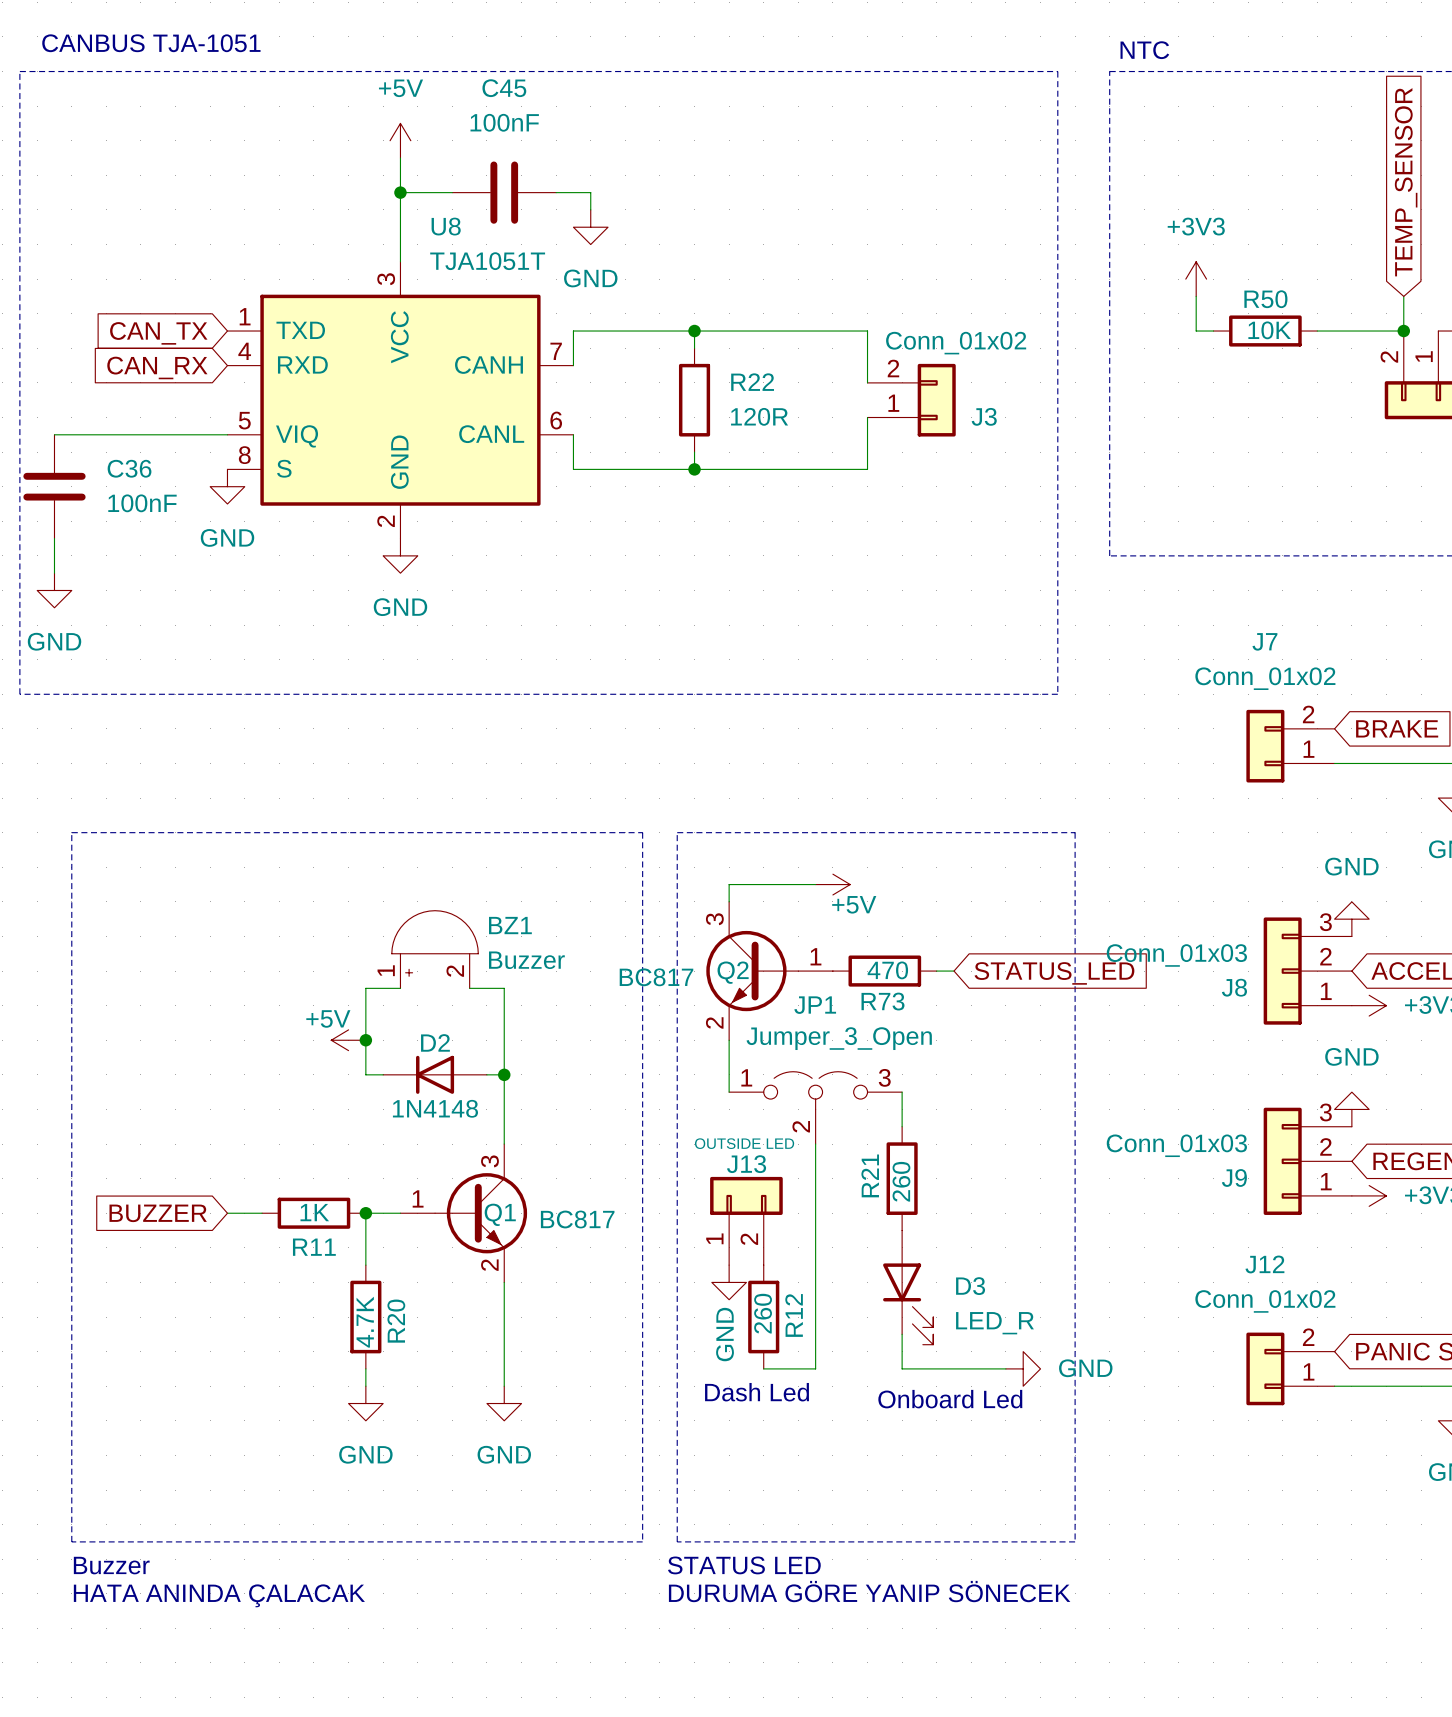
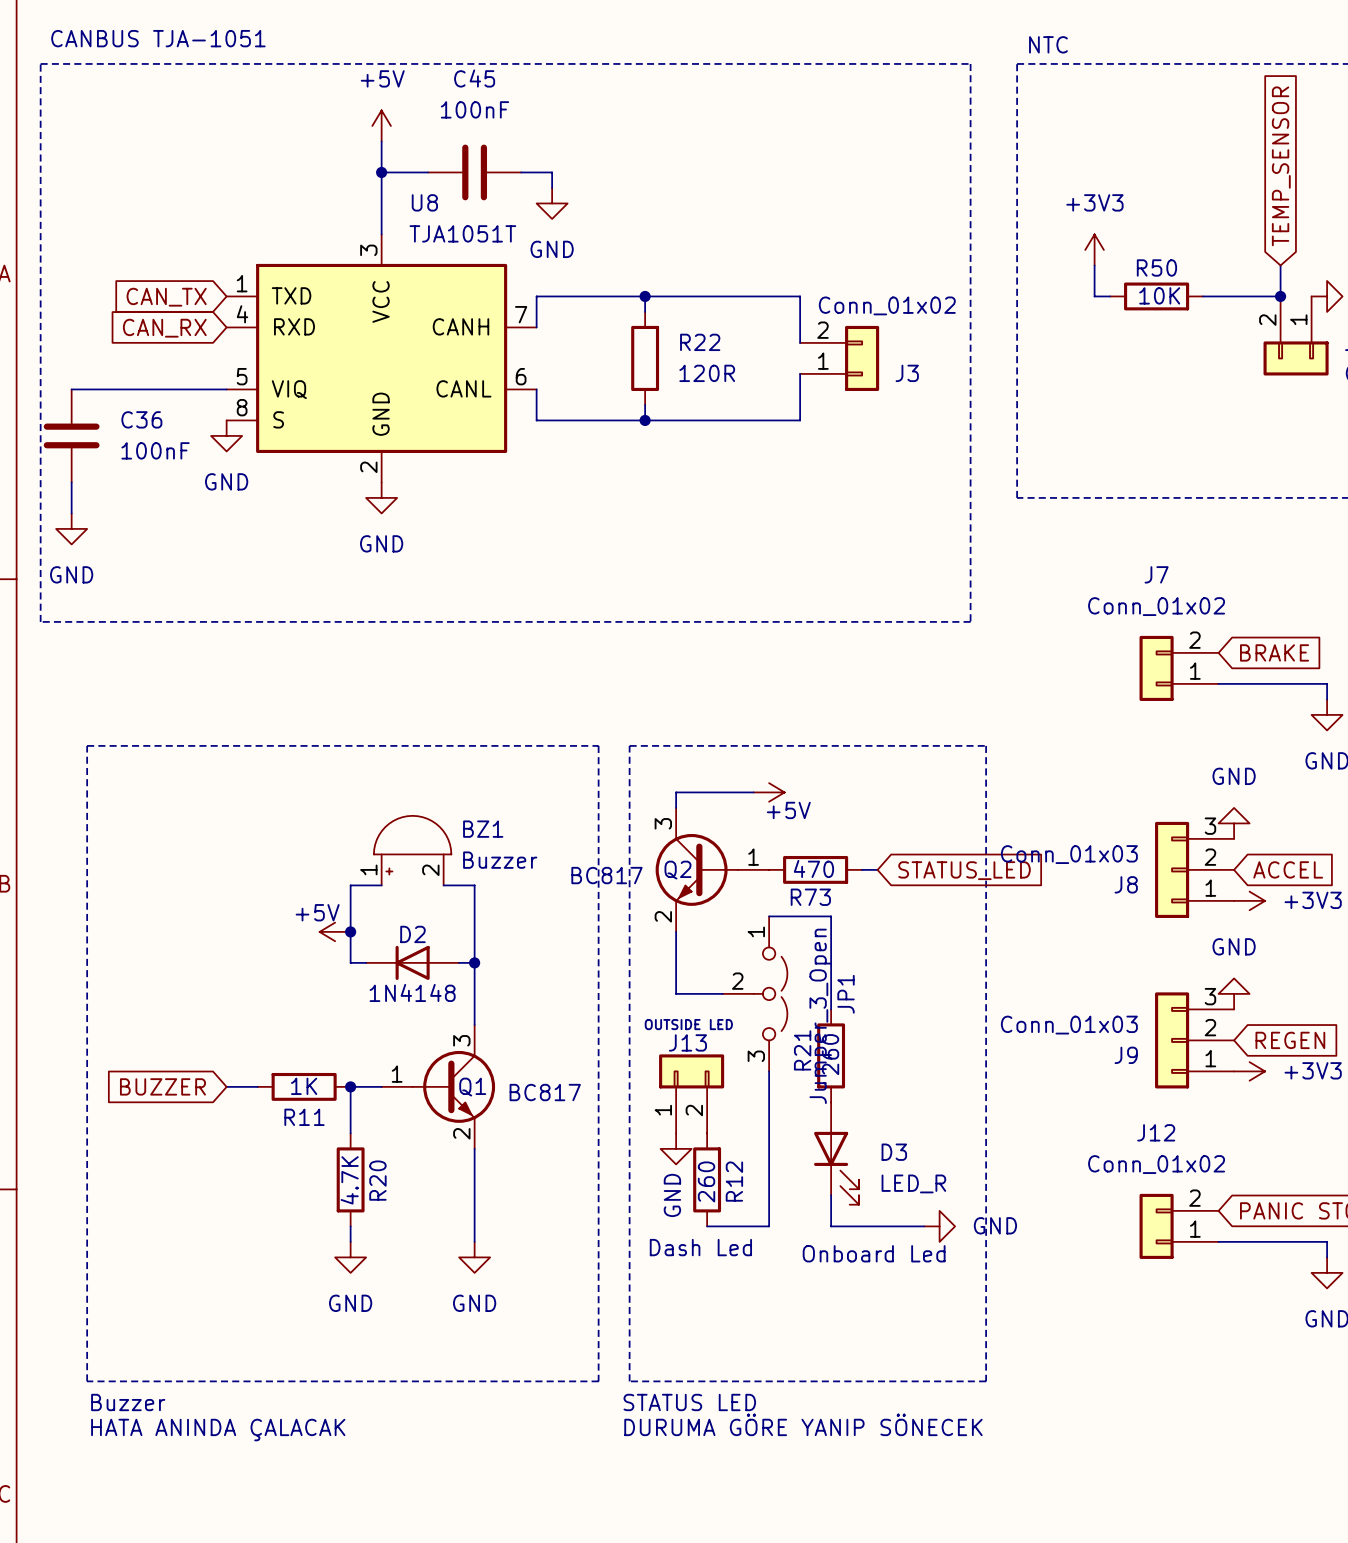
wire: none -> (769, 916) (831, 916) (831, 978)
JP1 rotation: 0° (815, 1090) -> 90° clockwise (770, 993)
wire: none -> (676, 978) (676, 993) (722, 993)
wire: (815, 1144) (815, 1368) -> (769, 1071) (769, 1226) (753, 1226)

